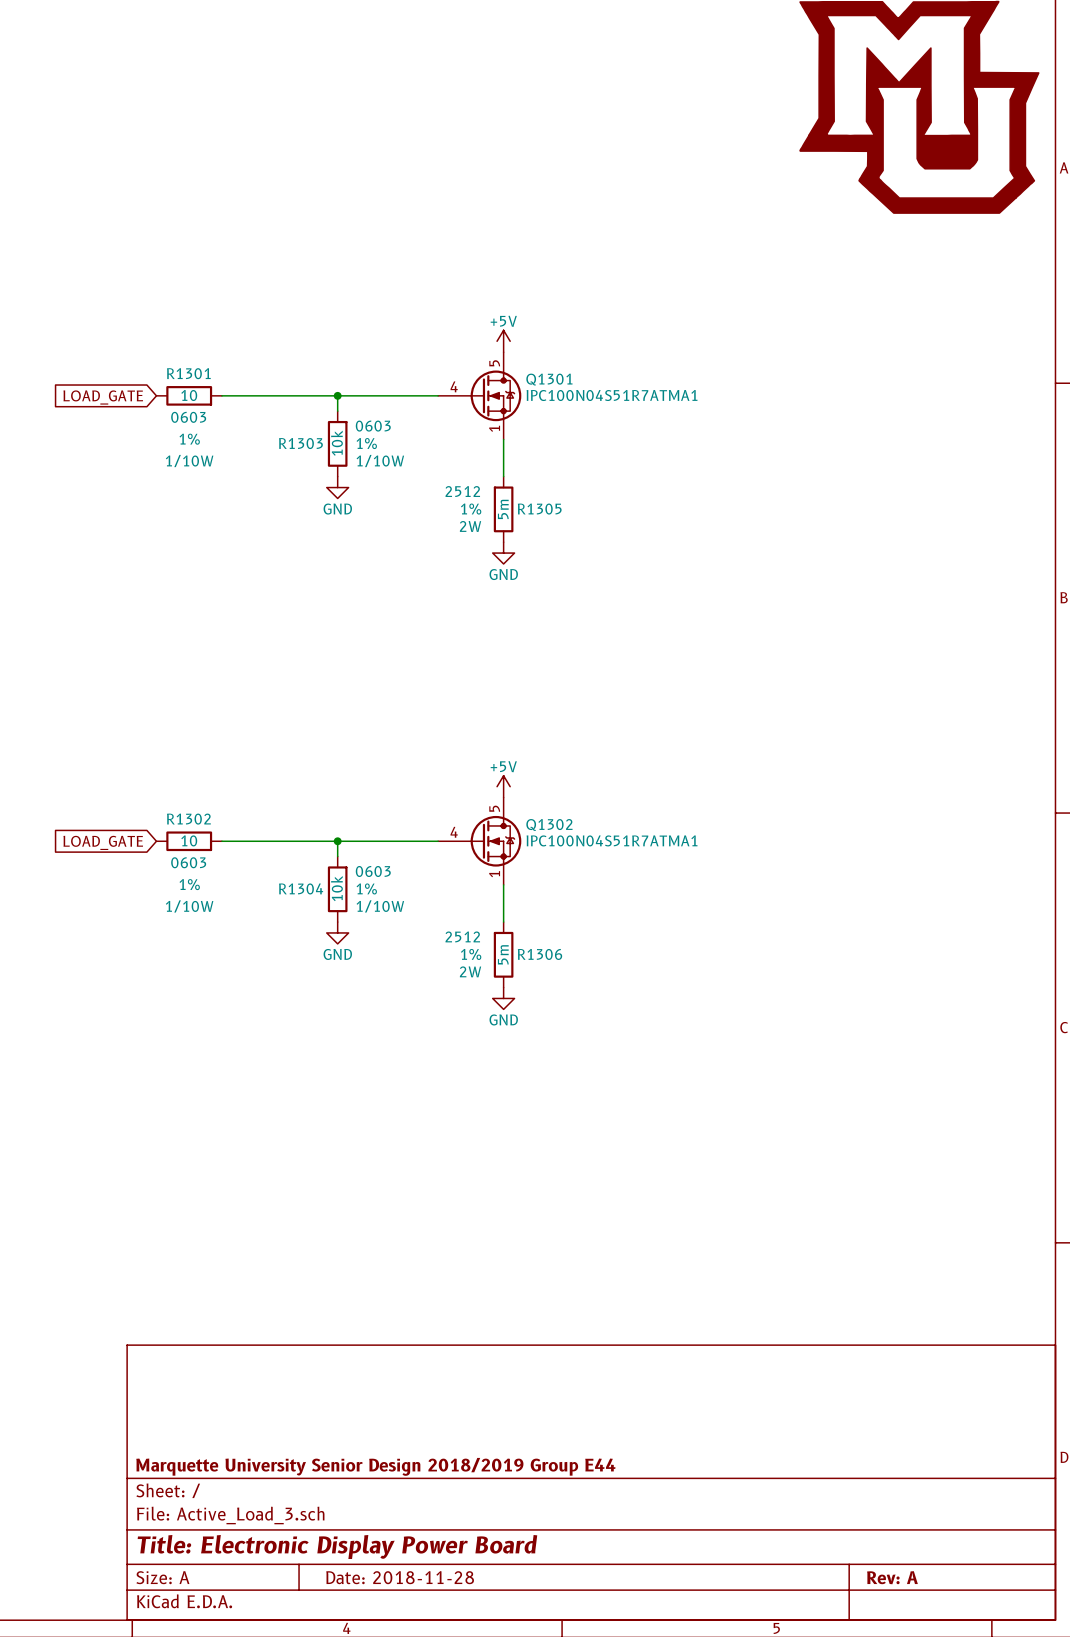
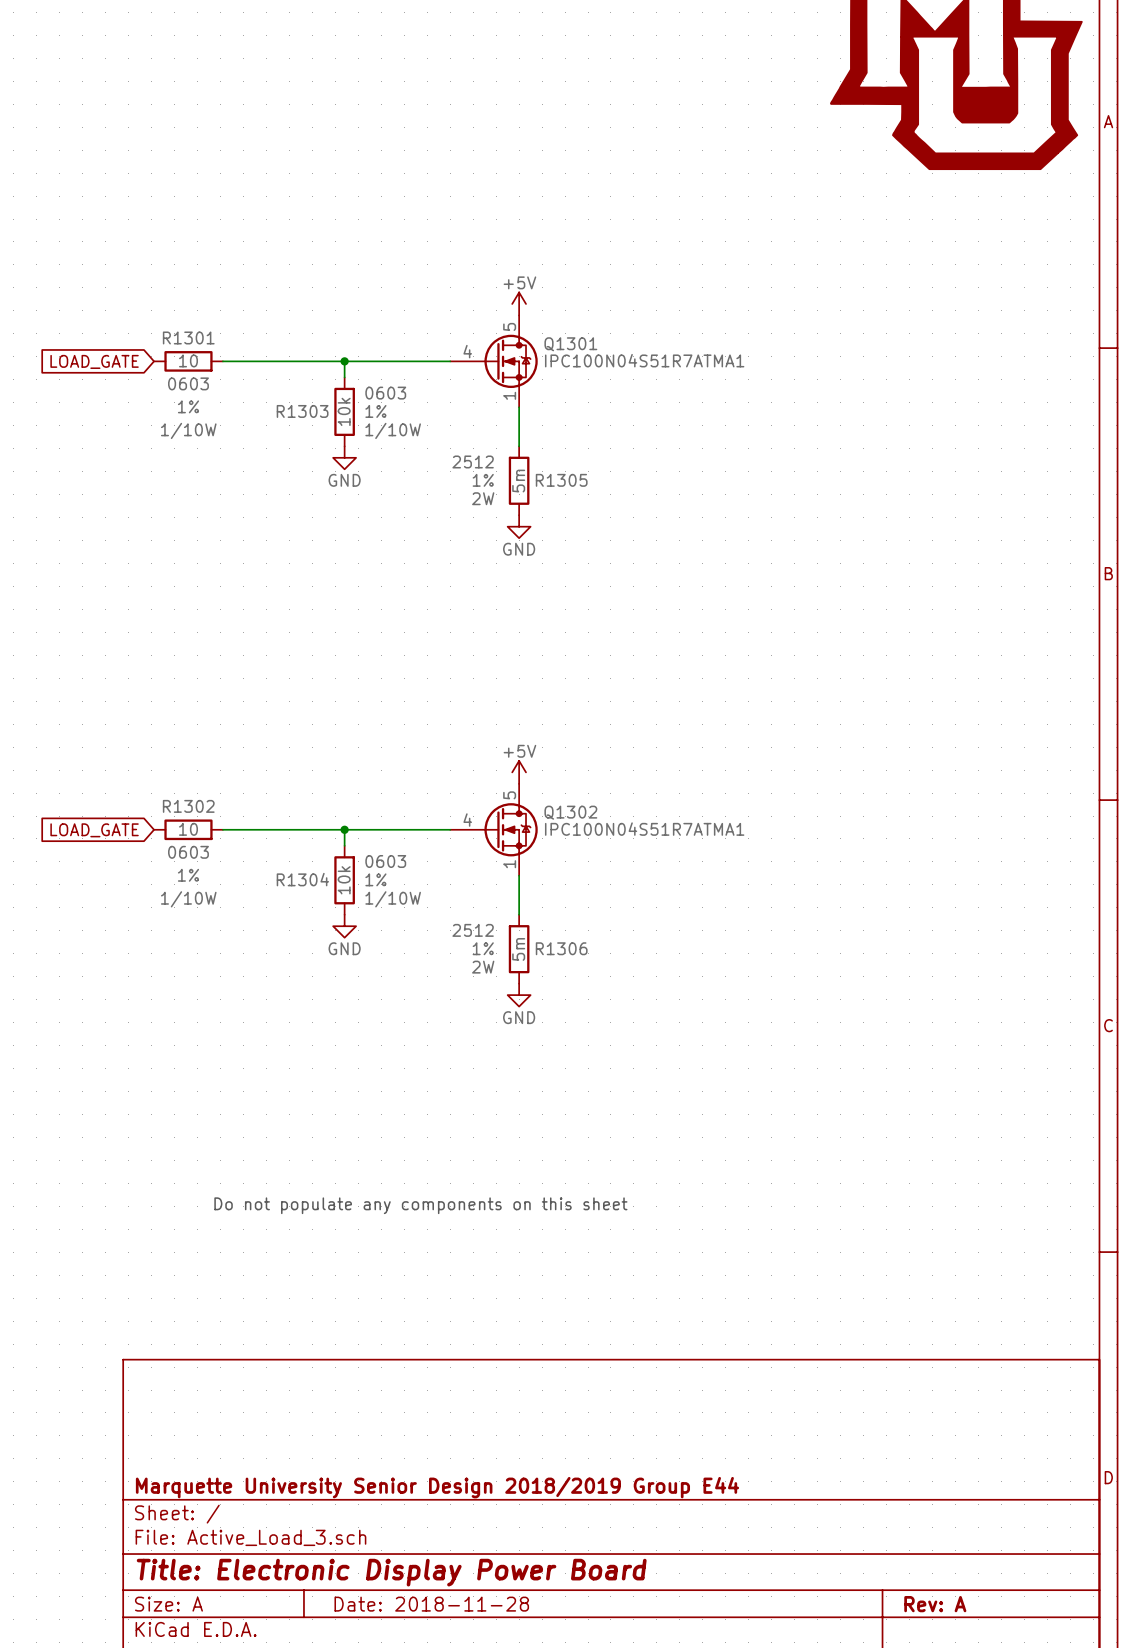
text: none -> Do not populate any components on this sheet (420, 1205)

